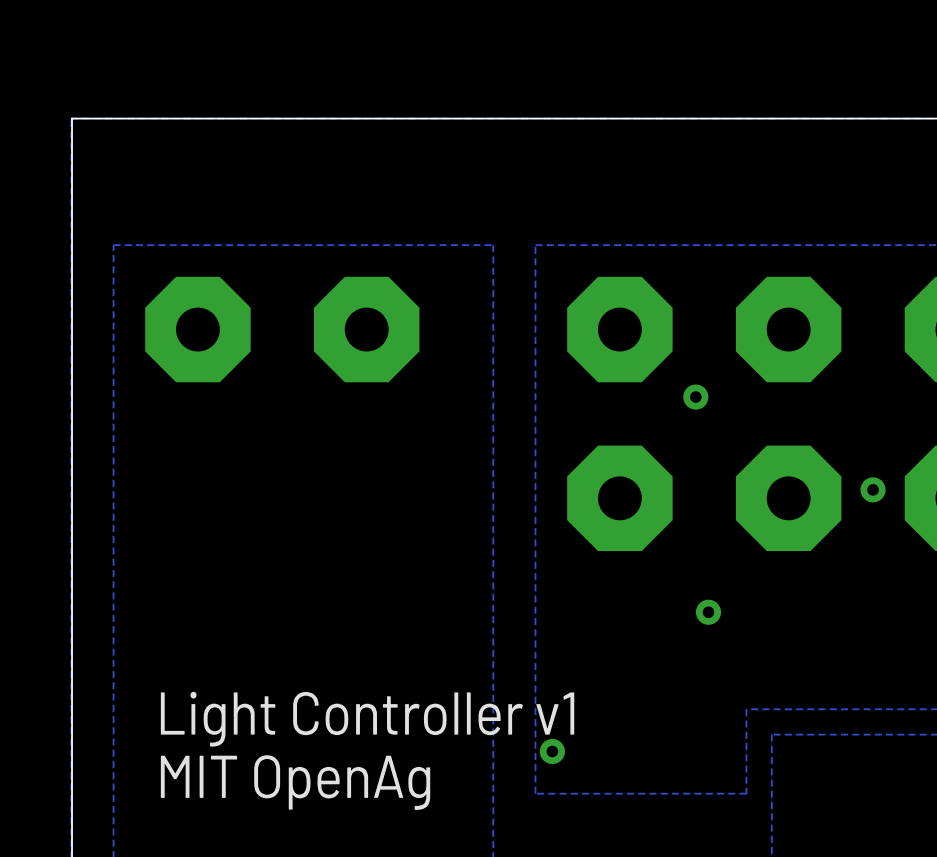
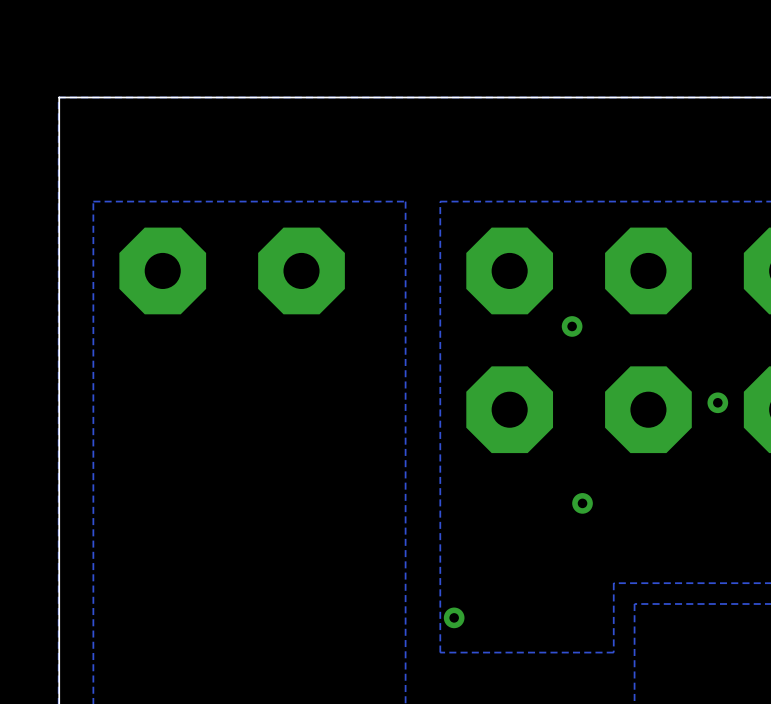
text: Light Controller v1 (367, 719) -> none
text: MIT OpenAg (295, 782) -> none

